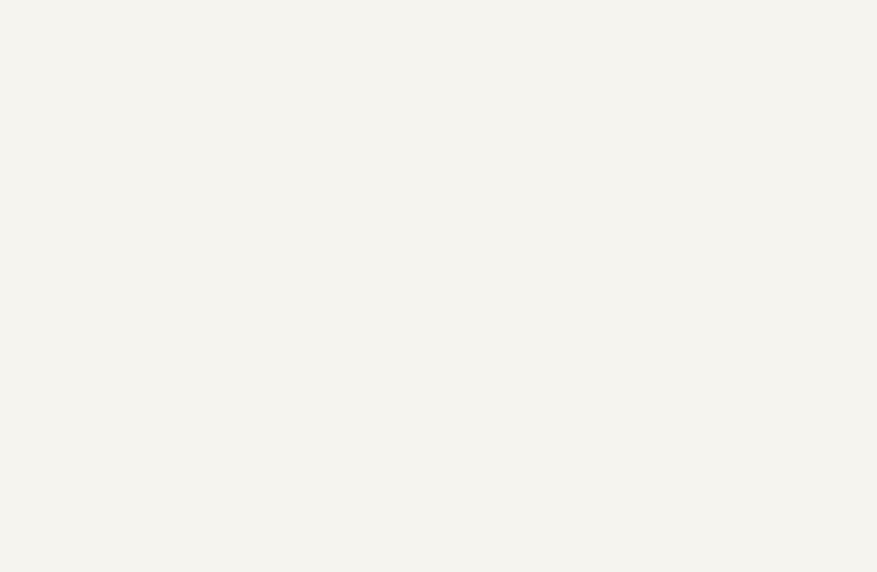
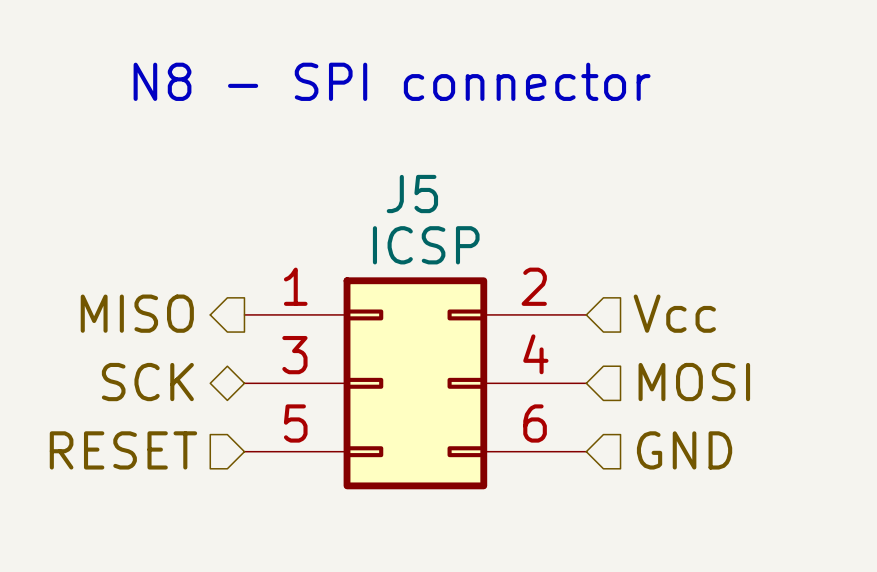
text: none -> N8 - SPI connector (392, 81)
hierarchical label: none -> MISO (137, 313)
hierarchical label: none -> Vcc (674, 313)
hierarchical label: none -> SCK (147, 382)
hierarchical label: none -> MOSI (694, 382)
J5: none -> ICSP (415, 383)
hierarchical label: none -> RESET (123, 450)
hierarchical label: none -> GND (684, 450)

